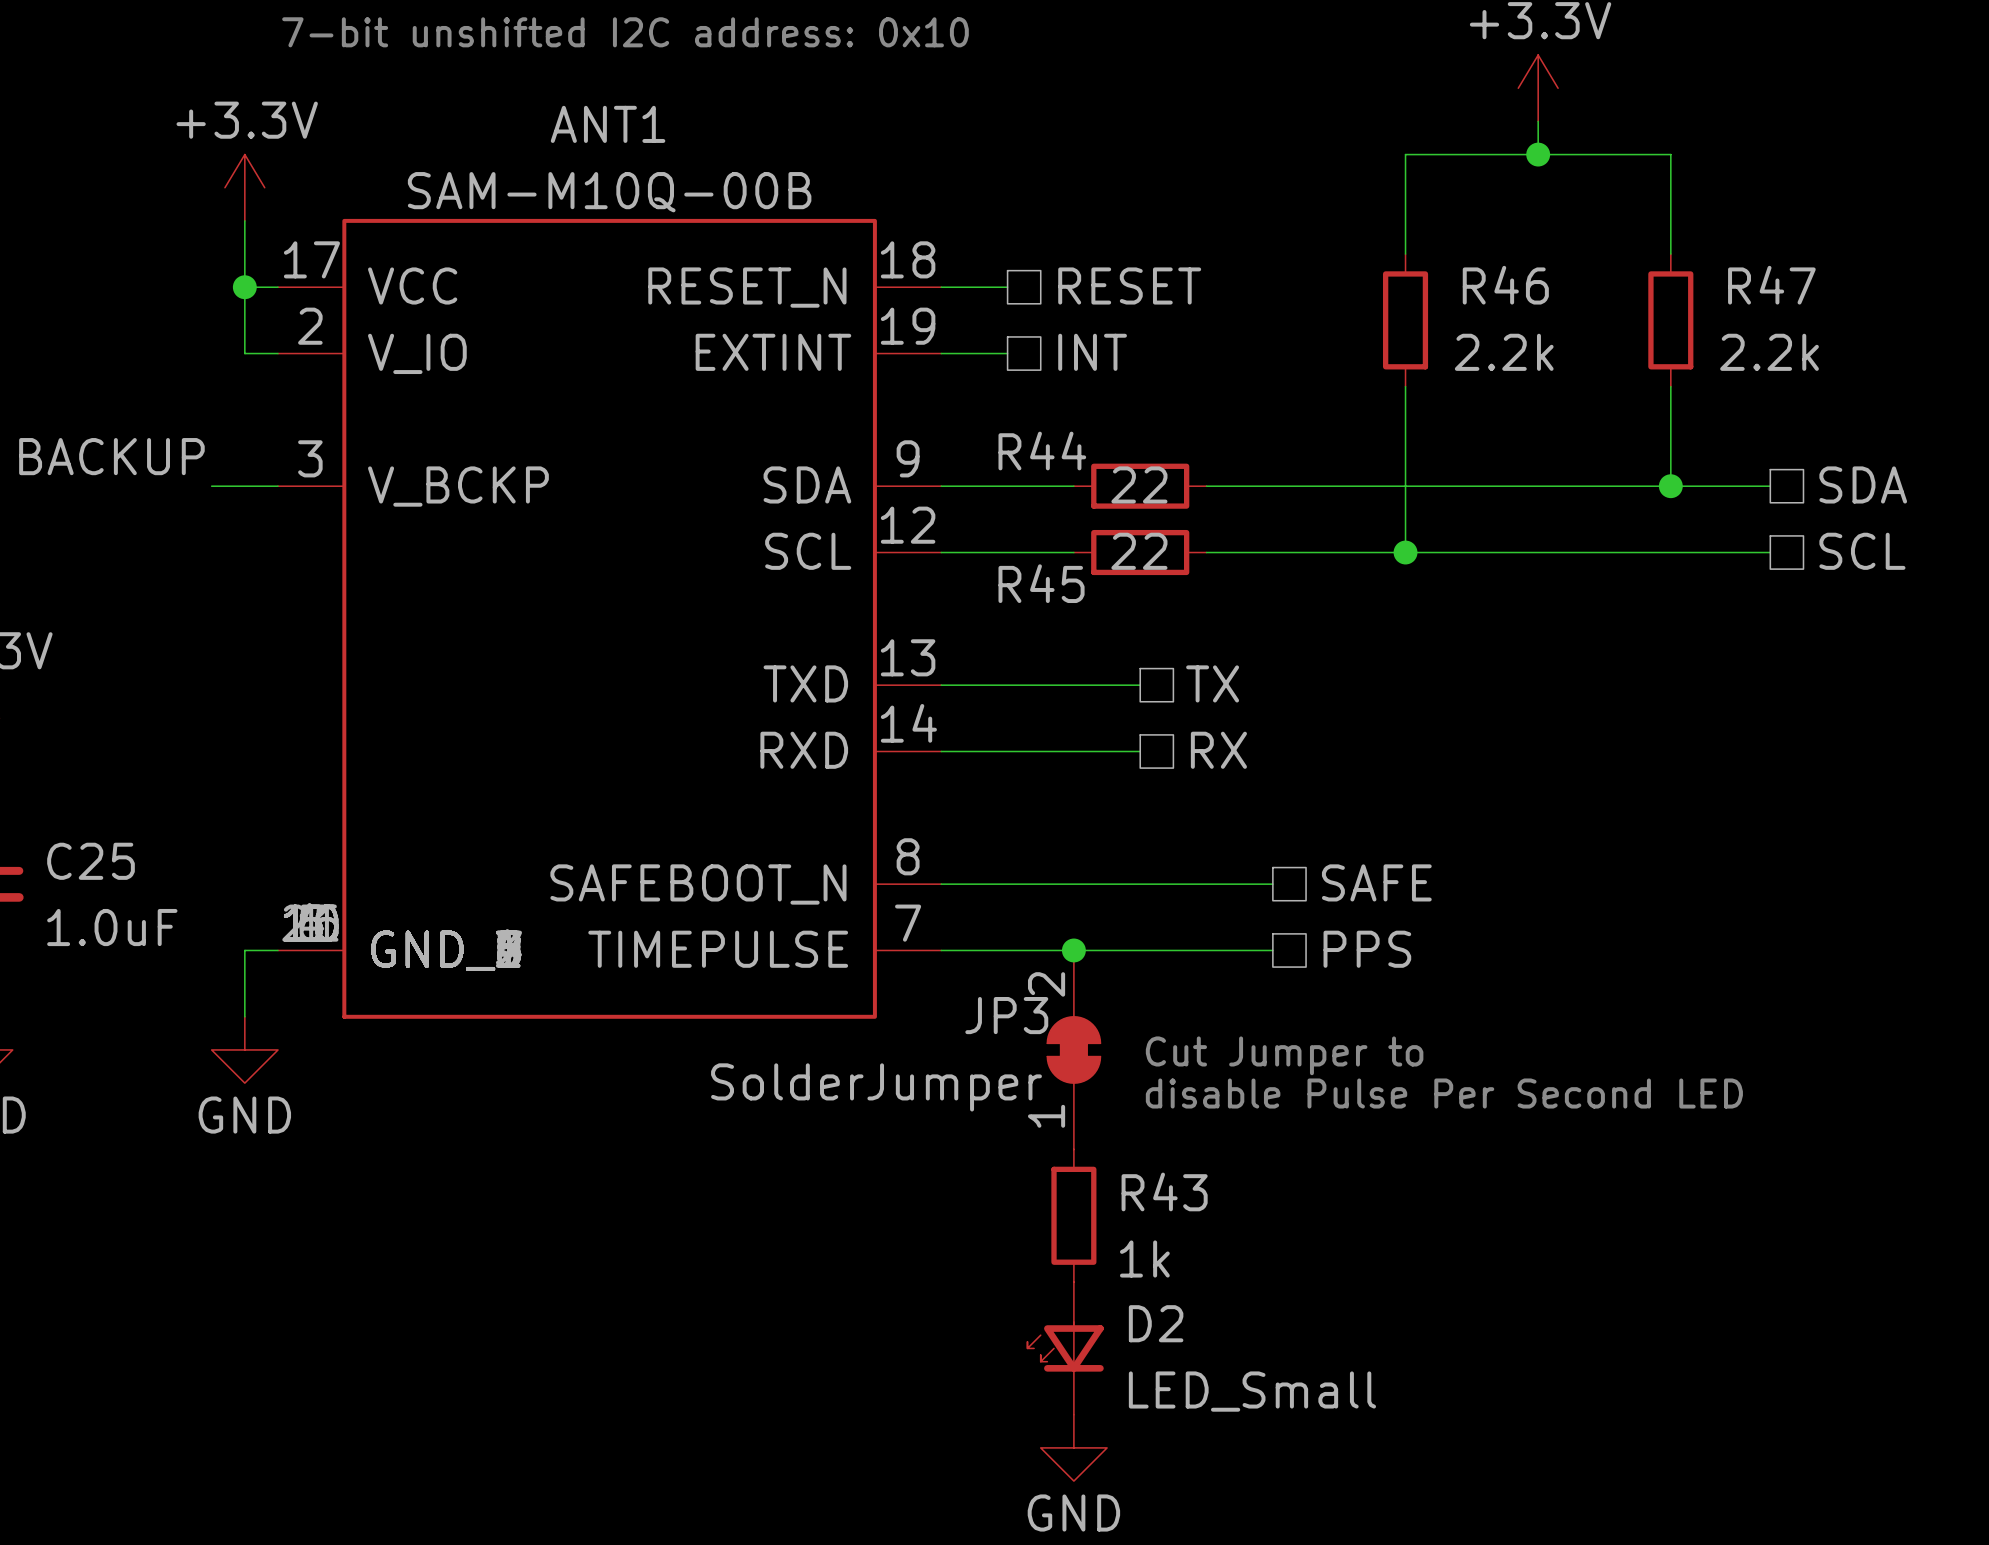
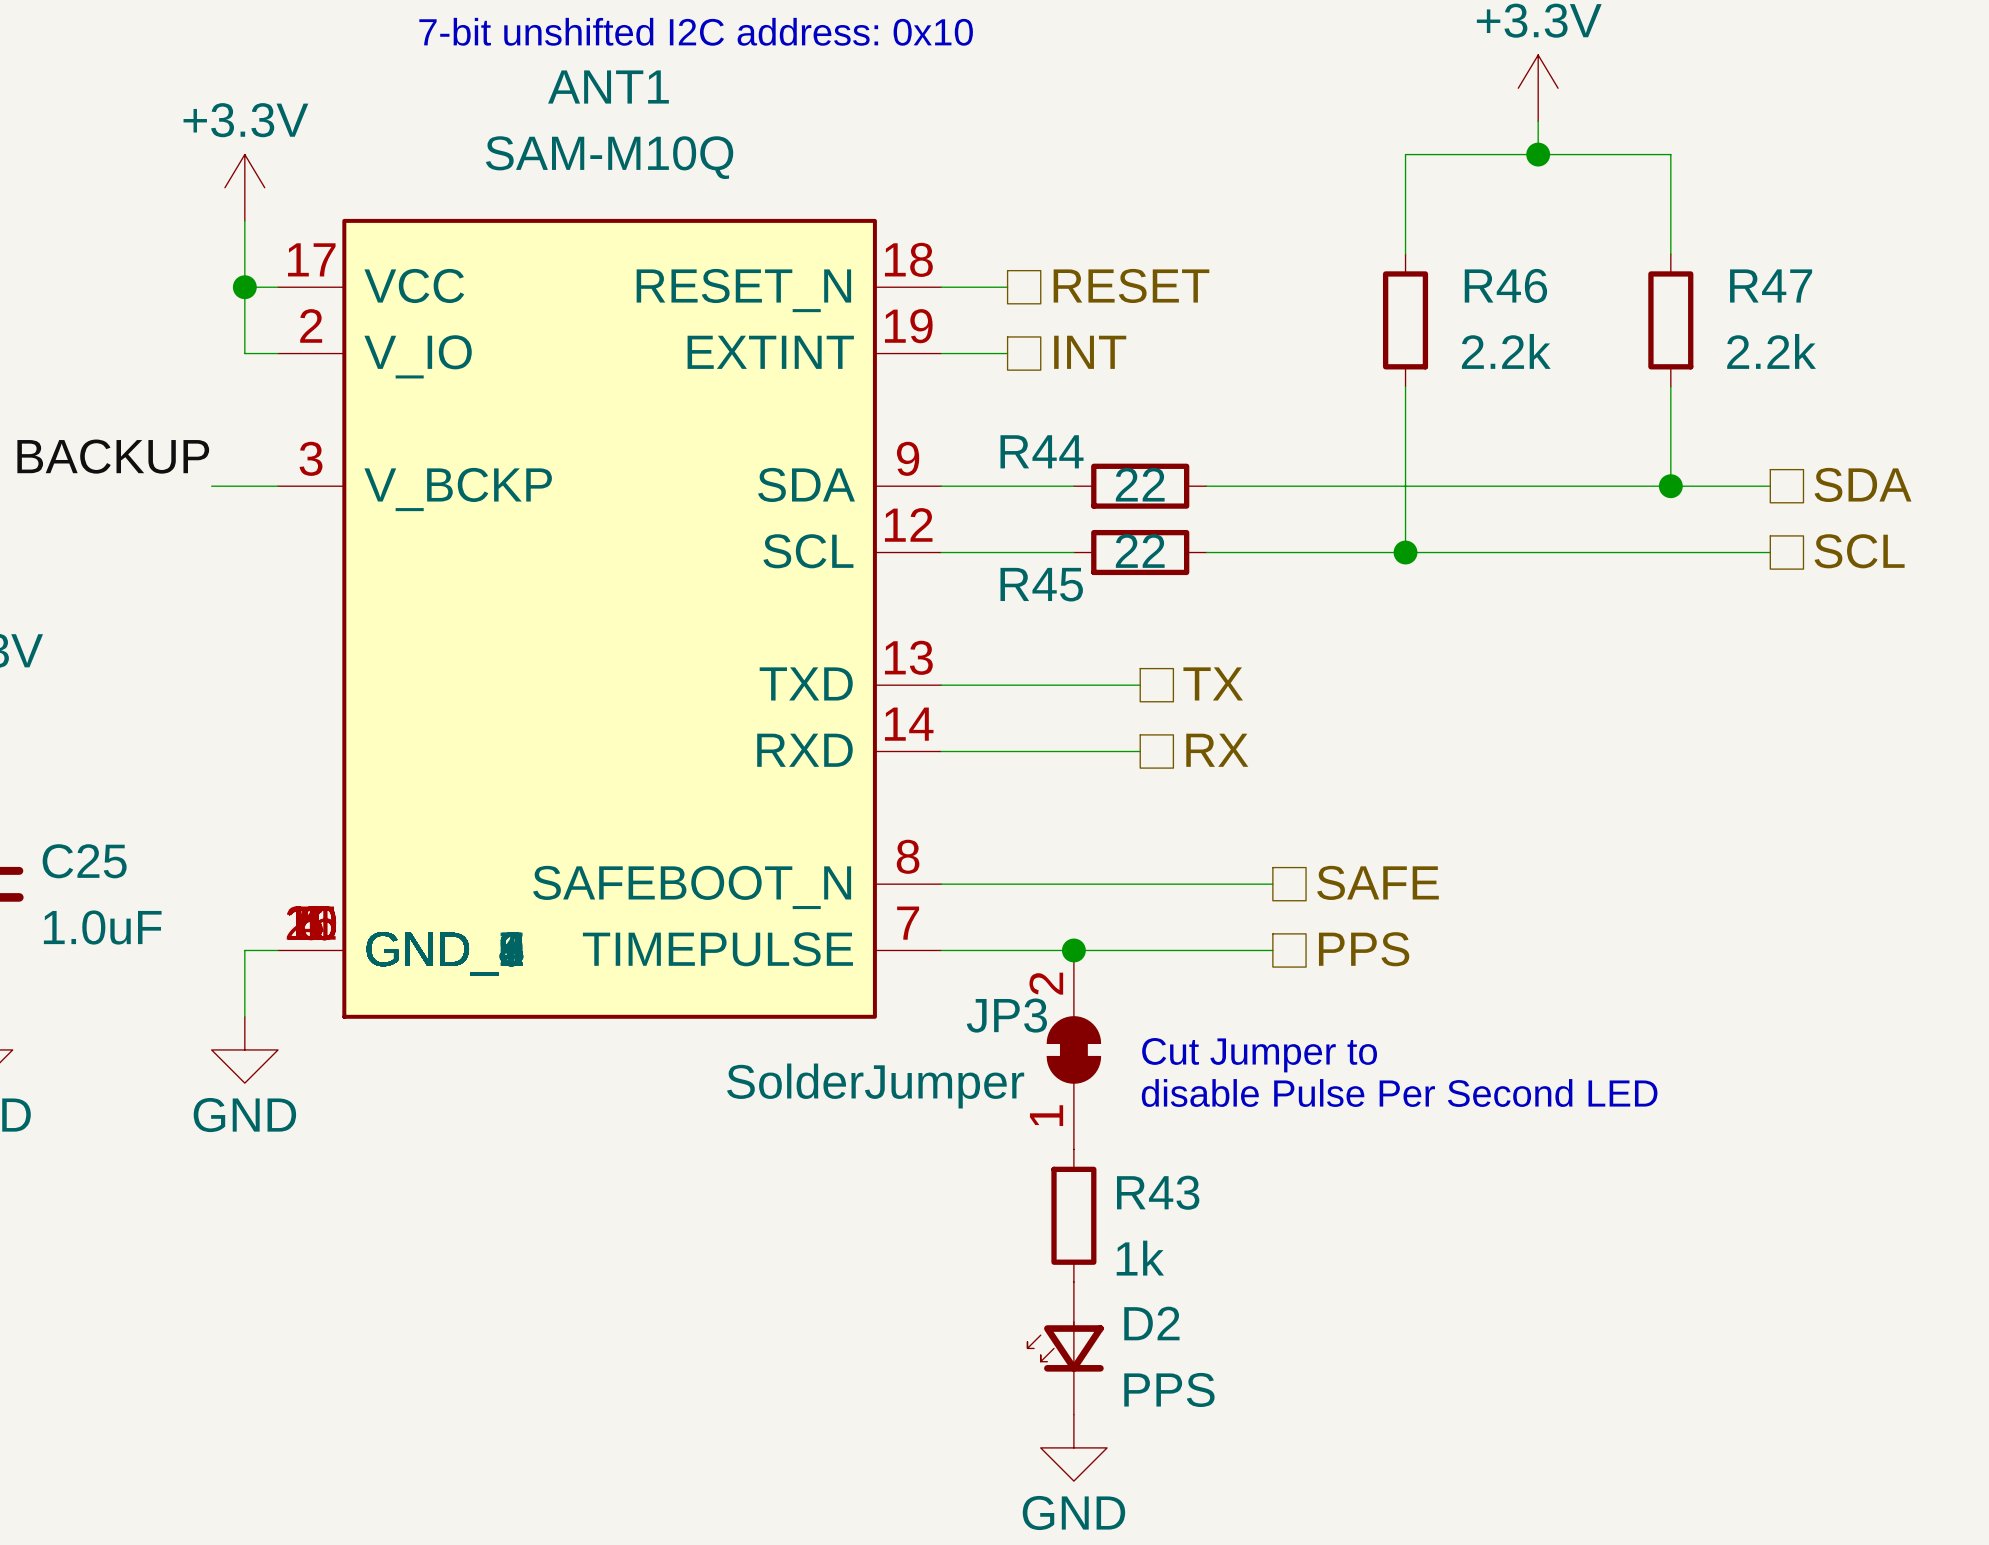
ANT1 name position: ANT1 (608, 124) -> ANT1 (608, 87)
ANT1 value: SAM-M10Q-00B (609, 192) -> SAM-M10Q (609, 157)
D2 value: LED_Small (1252, 1391) -> PPS (1169, 1389)

